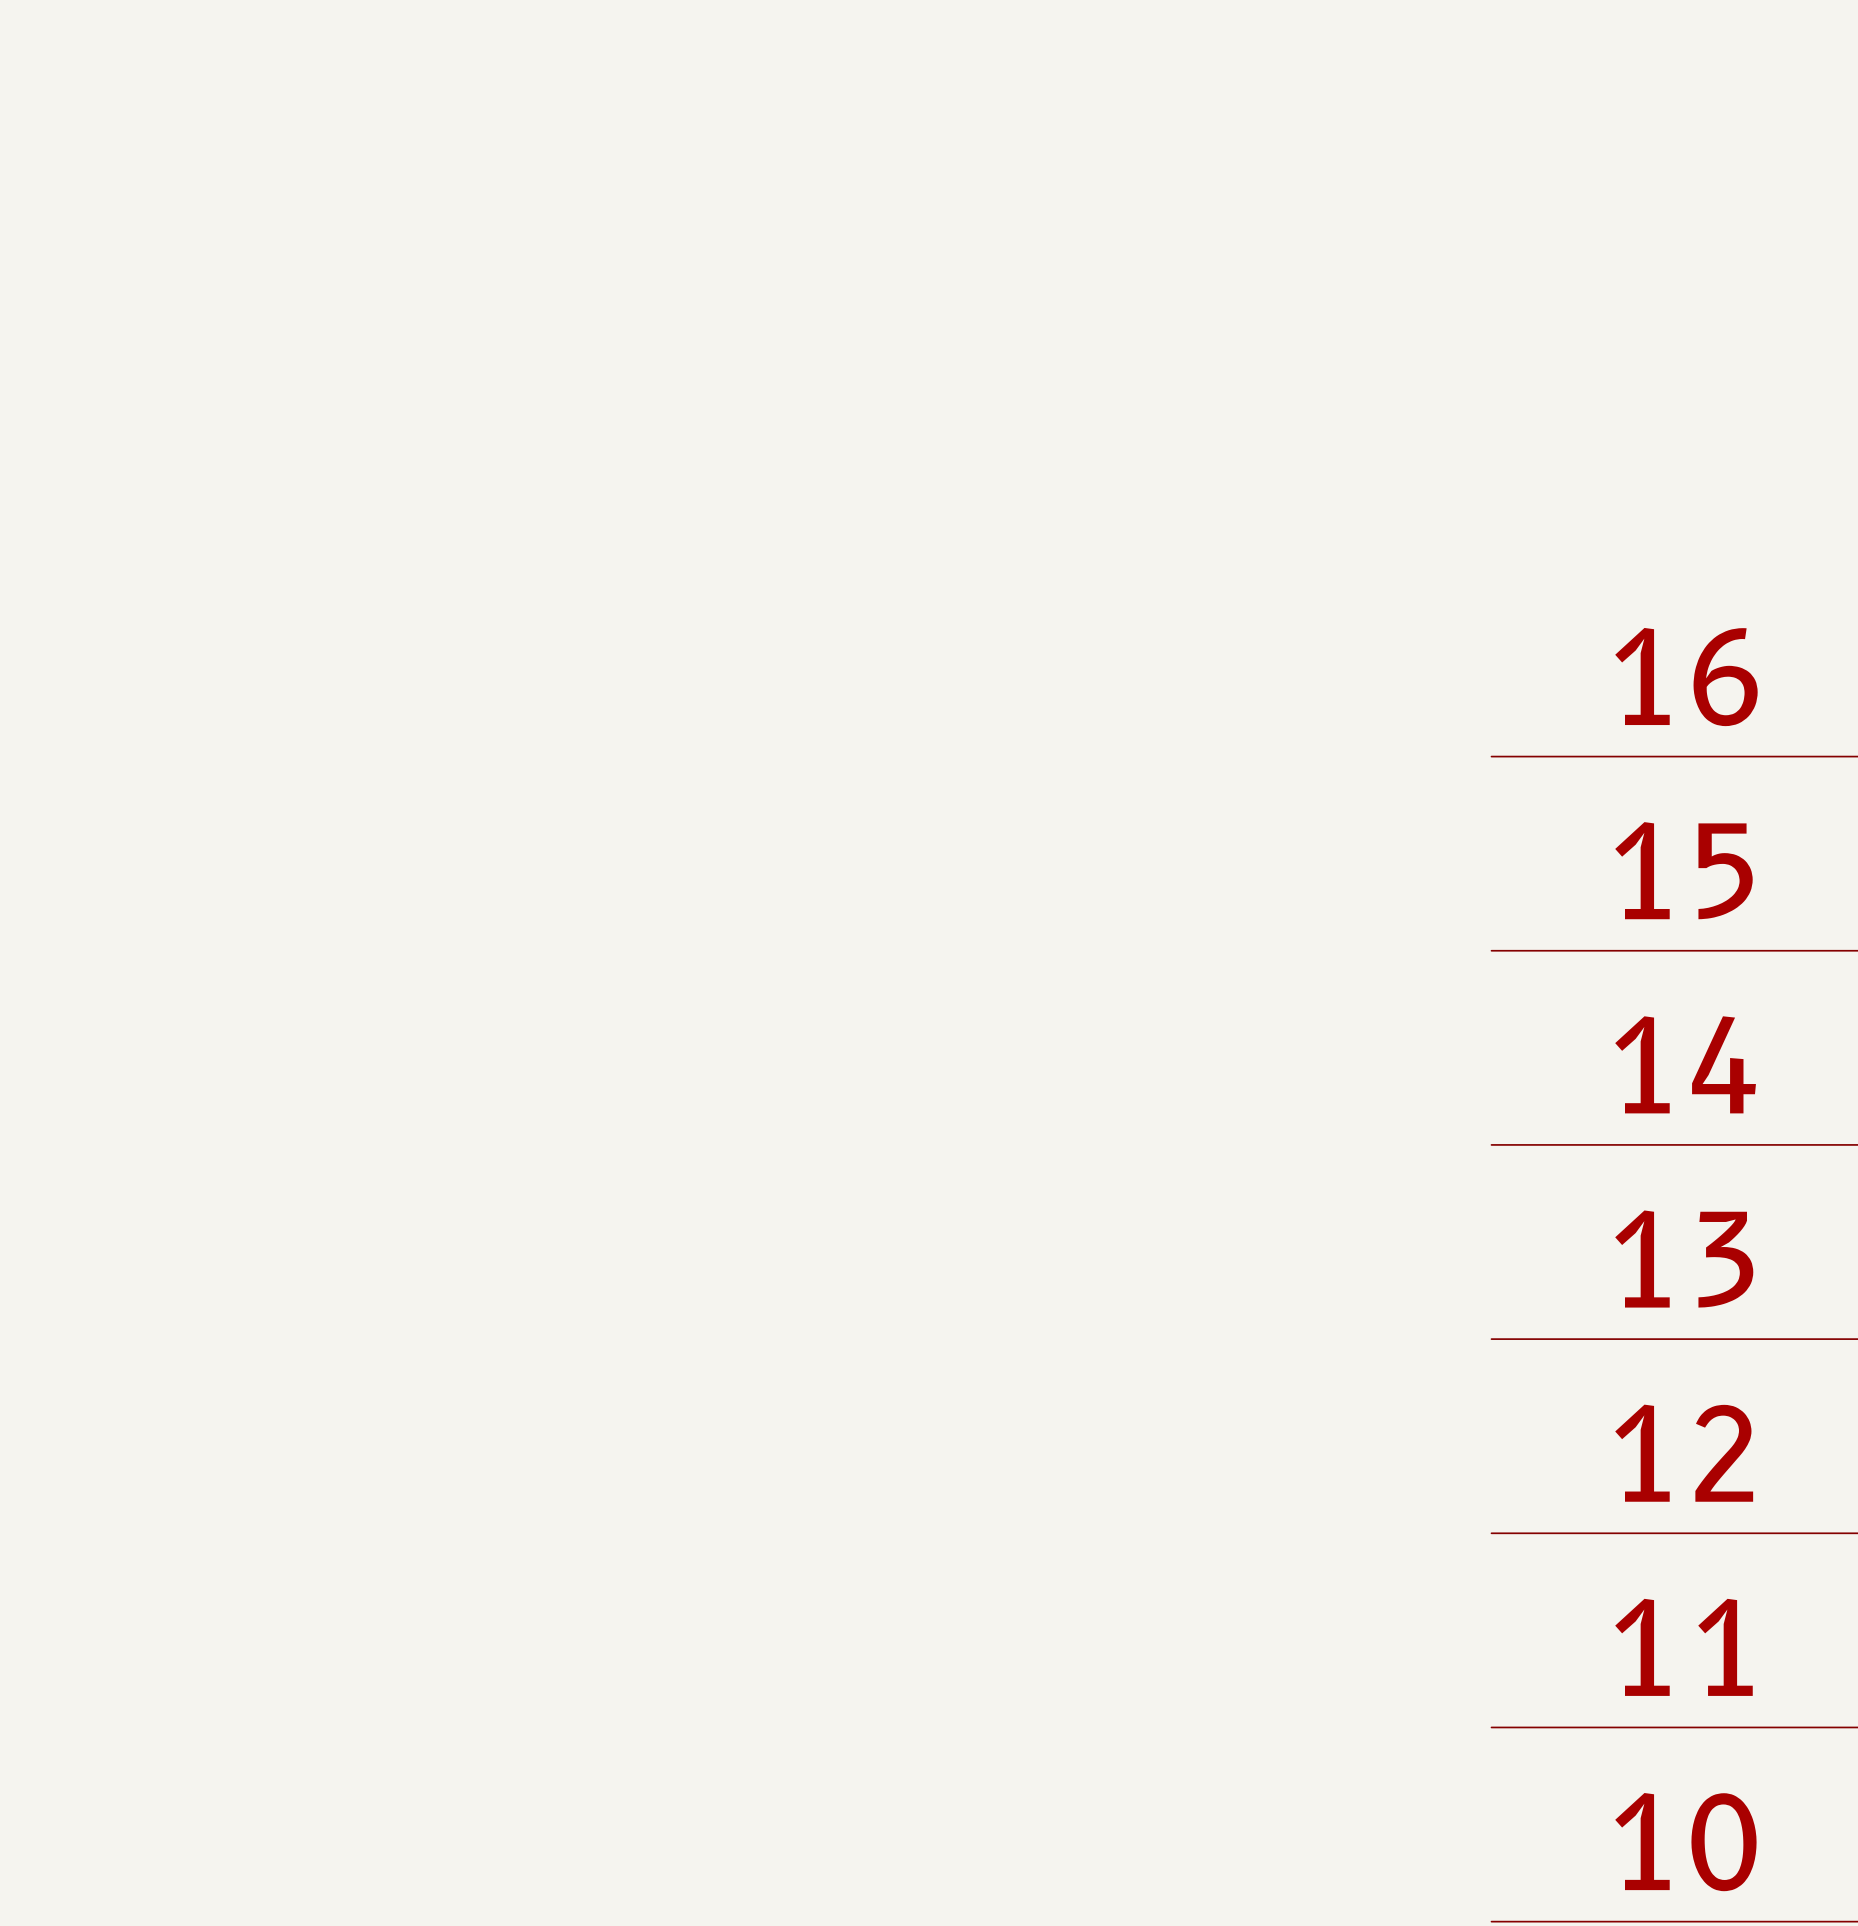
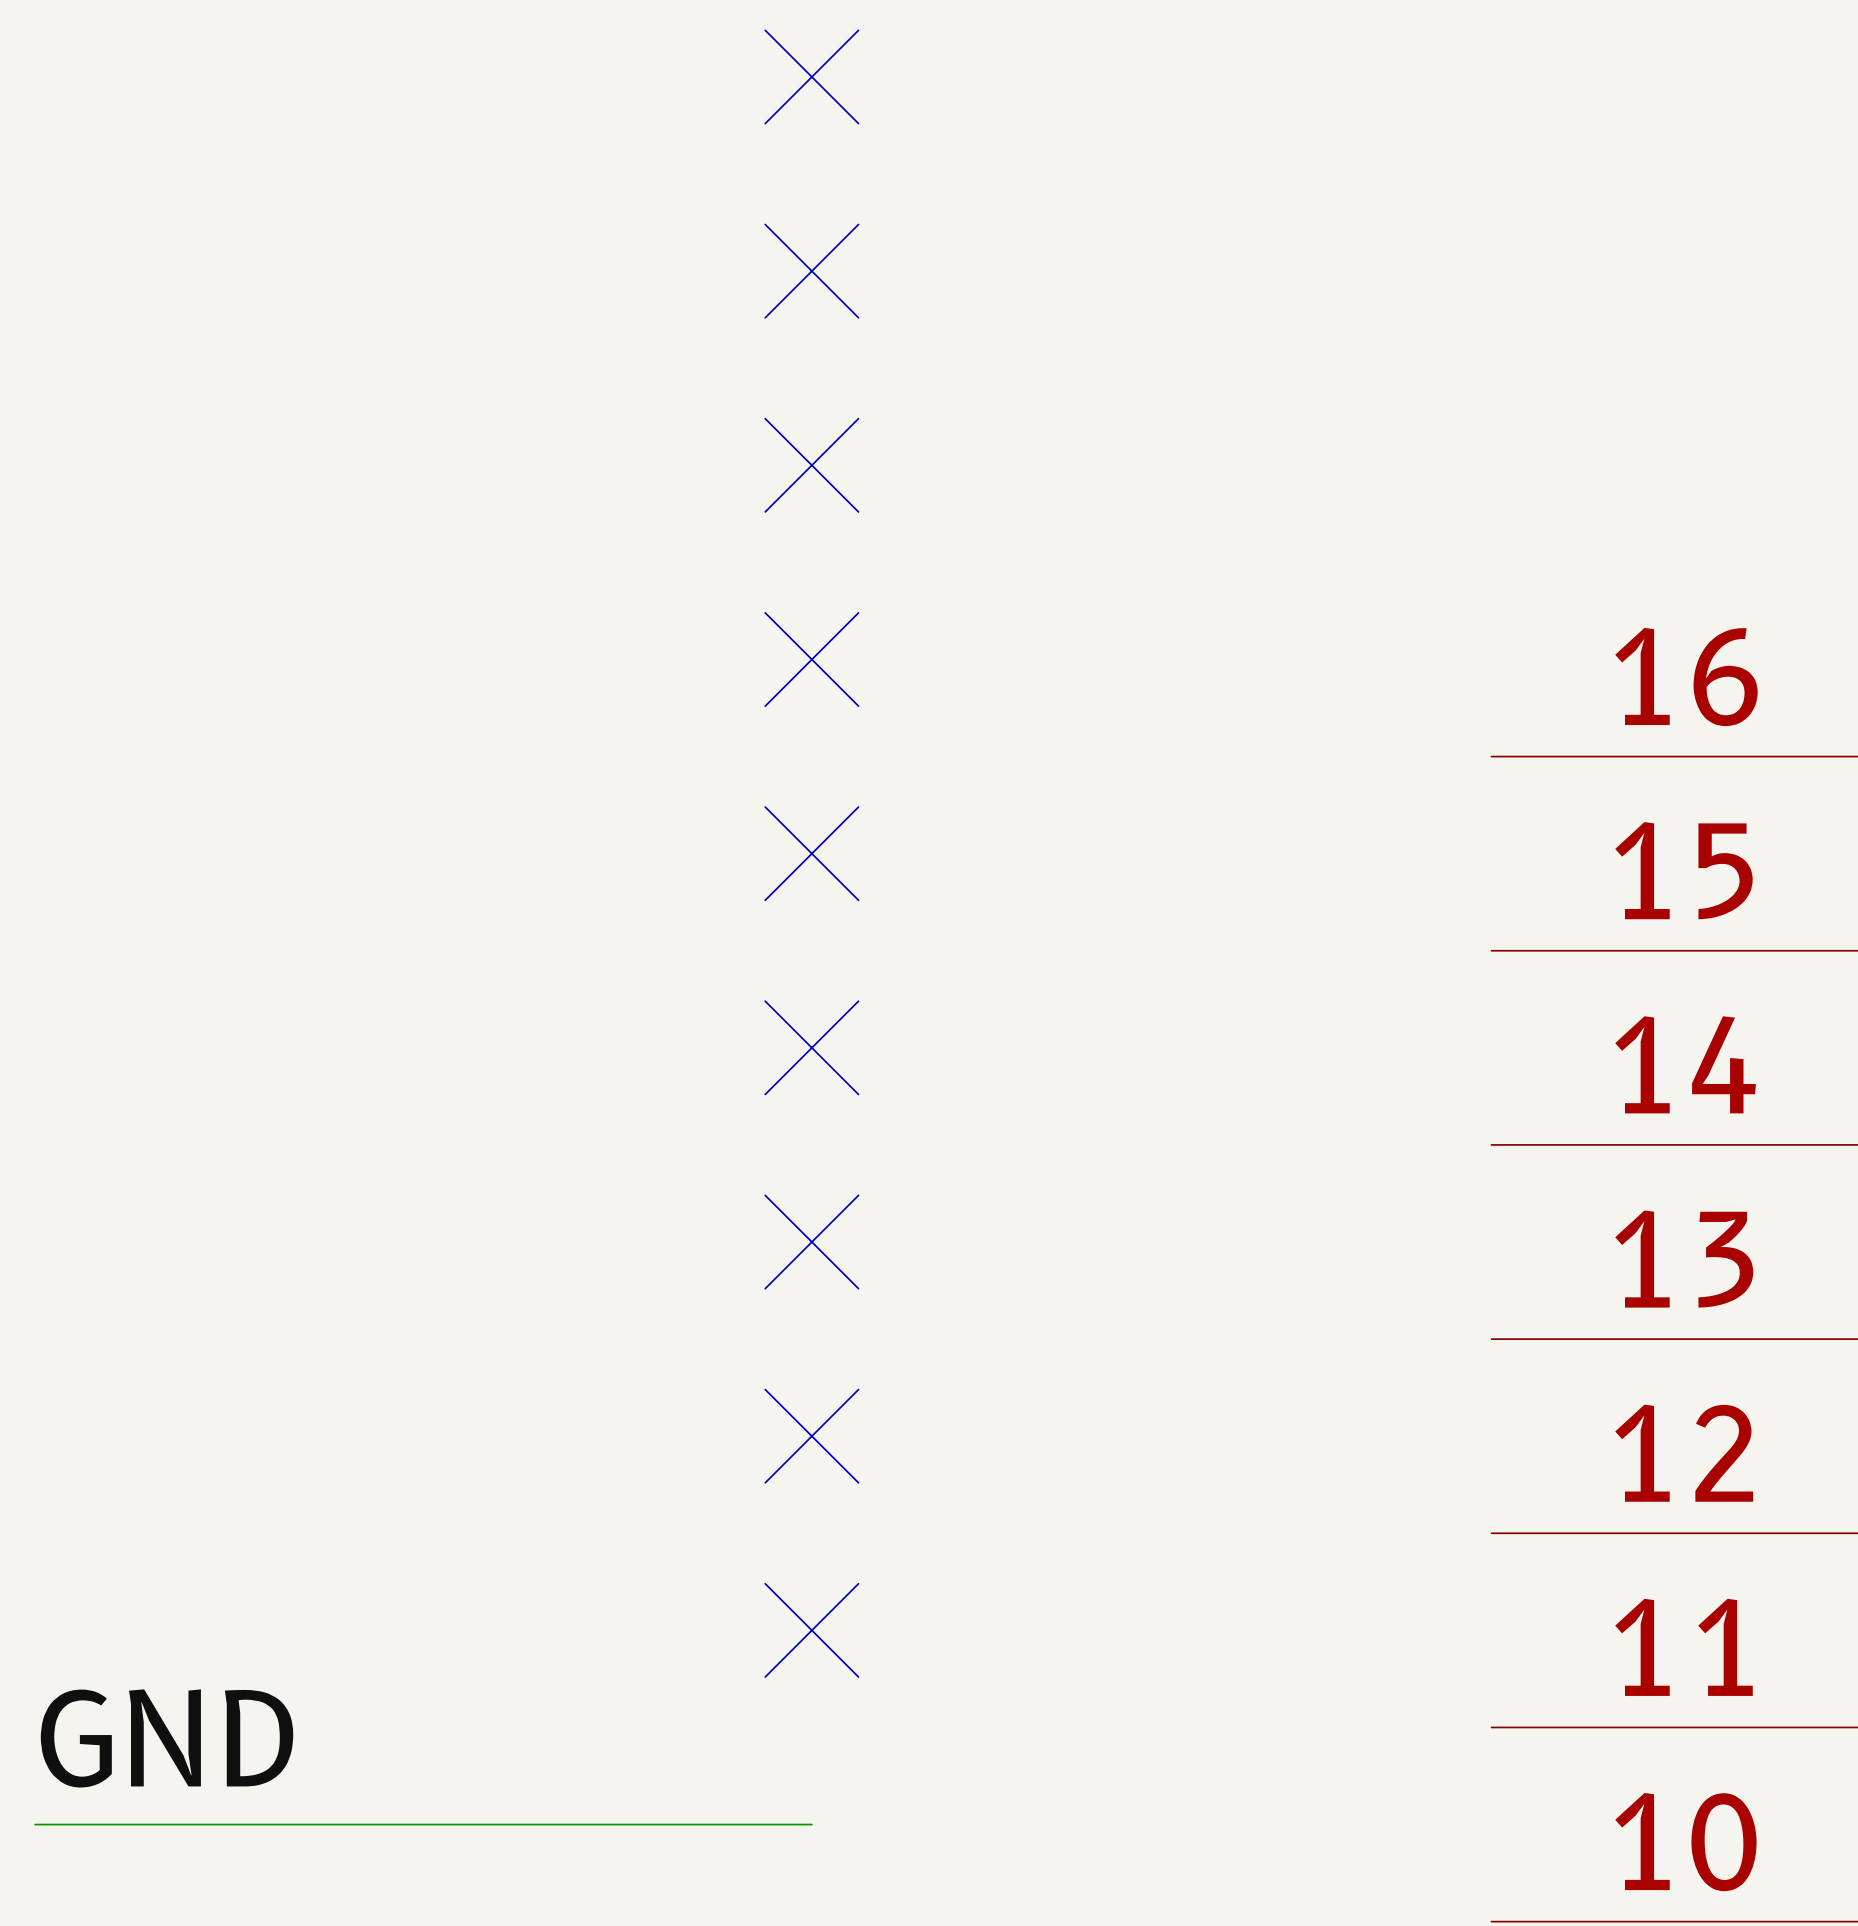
no-connect mark: none -> (811, 76)
no-connect mark: none -> (811, 271)
no-connect mark: none -> (811, 465)
no-connect mark: none -> (811, 659)
no-connect mark: none -> (811, 853)
no-connect mark: none -> (811, 1047)
no-connect mark: none -> (811, 1242)
no-connect mark: none -> (811, 1436)
no-connect mark: none -> (811, 1630)
label: none -> GND (167, 1738)
wire: none -> (35, 1824) (811, 1824)

